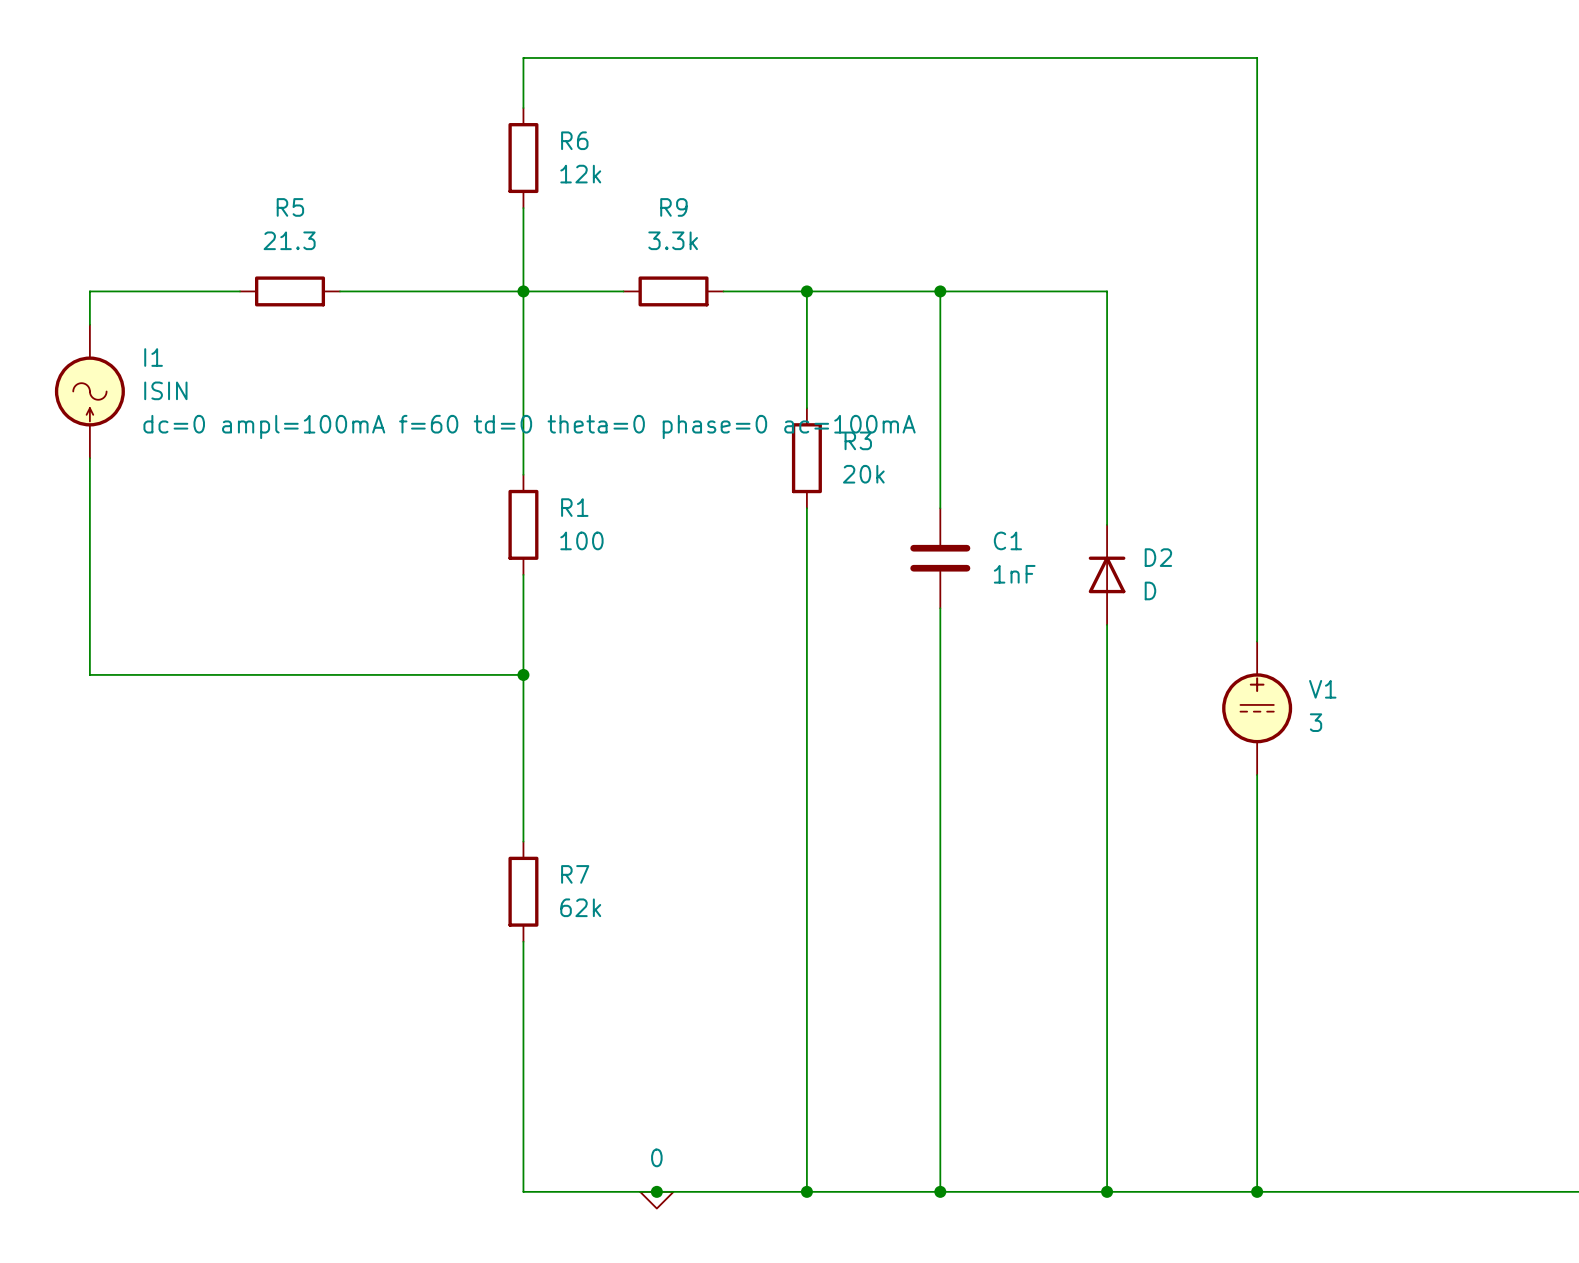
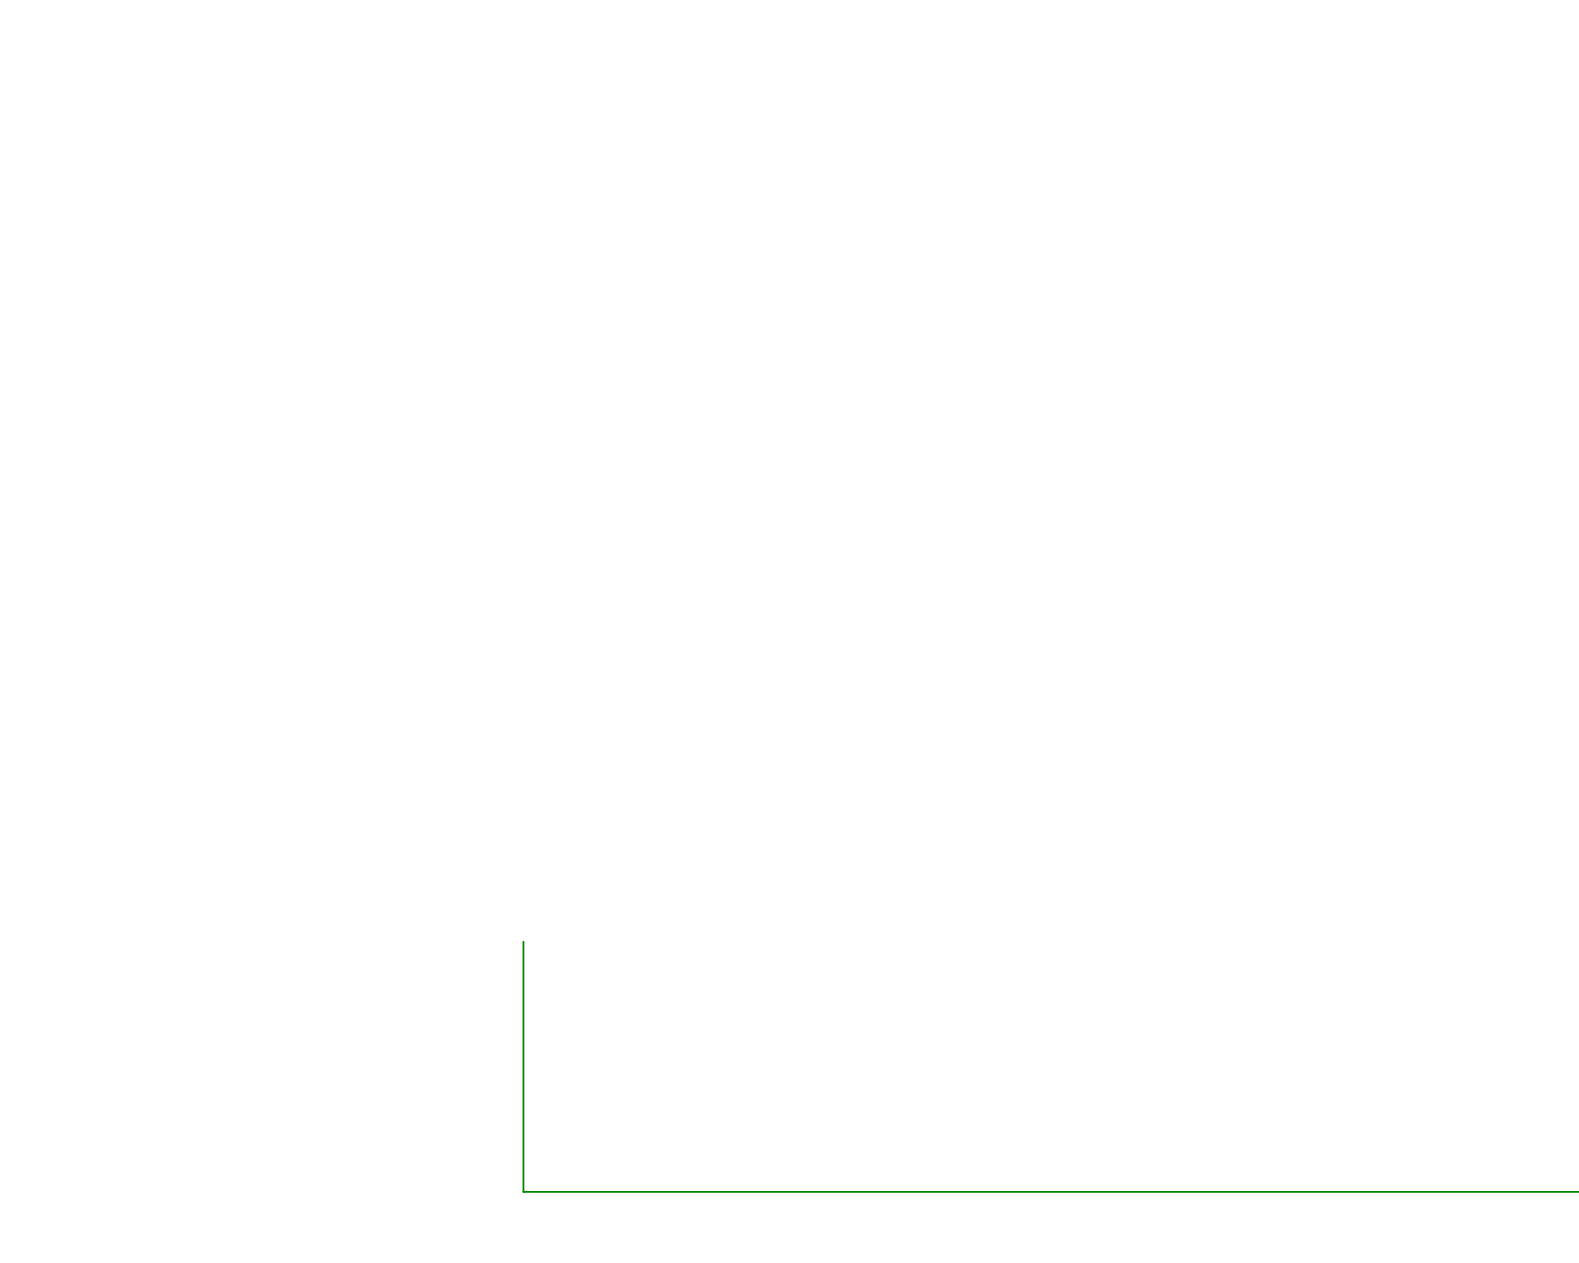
wire: (523, 108) (523, 57) (1257, 57) (1257, 641) -> none
R6: 12k (523, 158) -> none
wire: (523, 208) (523, 474) -> none
wire: (239, 291) (89, 291) (89, 324) -> none
R5: 21.3 (290, 291) -> none
wire: (340, 291) (623, 291) -> none
junction: (523, 291) -> none
R9: 3.3k (673, 291) -> none
wire: (723, 291) (1107, 291) (1107, 524) -> none
wire: (806, 291) (806, 408) -> none
junction: (806, 291) -> none
wire: (940, 291) (940, 508) -> none
junction: (940, 291) -> none
I1: ISIN (89, 391) -> none
wire: (89, 458) (89, 674) (523, 674) -> none
R3: 20k (806, 458) -> none
wire: (806, 508) (806, 1191) -> none
R1: 100 (523, 524) -> none
C1: 1nF (940, 558) -> none
wire: (523, 574) (523, 841) -> none
D2: D (1107, 574) -> none
wire: (940, 608) (940, 1191) -> none
wire: (1107, 624) (1107, 1191) -> none
junction: (523, 674) -> none
V1: 3 (1257, 708) -> none
wire: (1257, 775) (1257, 1191) -> none
R7: 62k (523, 891) -> none
junction: (656, 1191) -> none
junction: (806, 1191) -> none
junction: (940, 1191) -> none
junction: (1107, 1191) -> none
junction: (1257, 1191) -> none
power symbol: 0 (656, 1200) -> none

